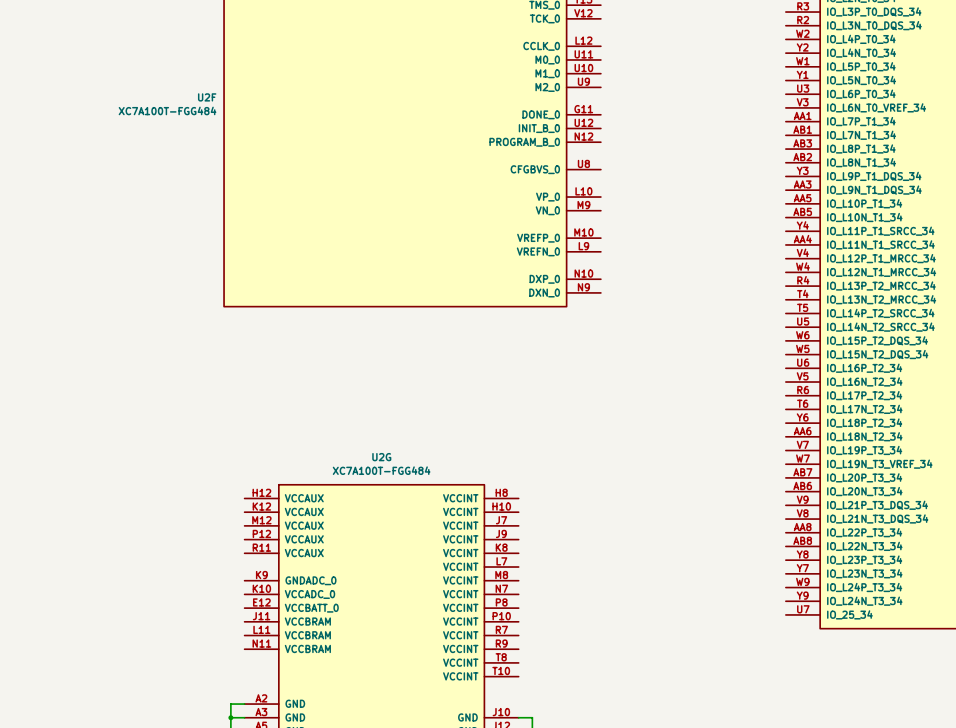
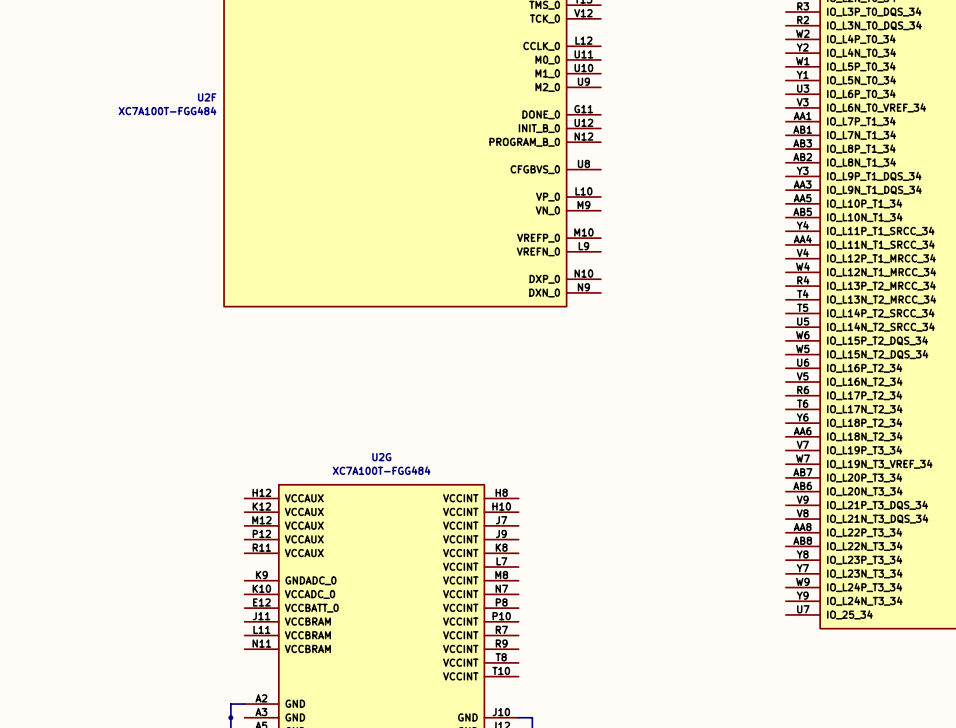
wire: (230, 717) (244, 717) -> none

